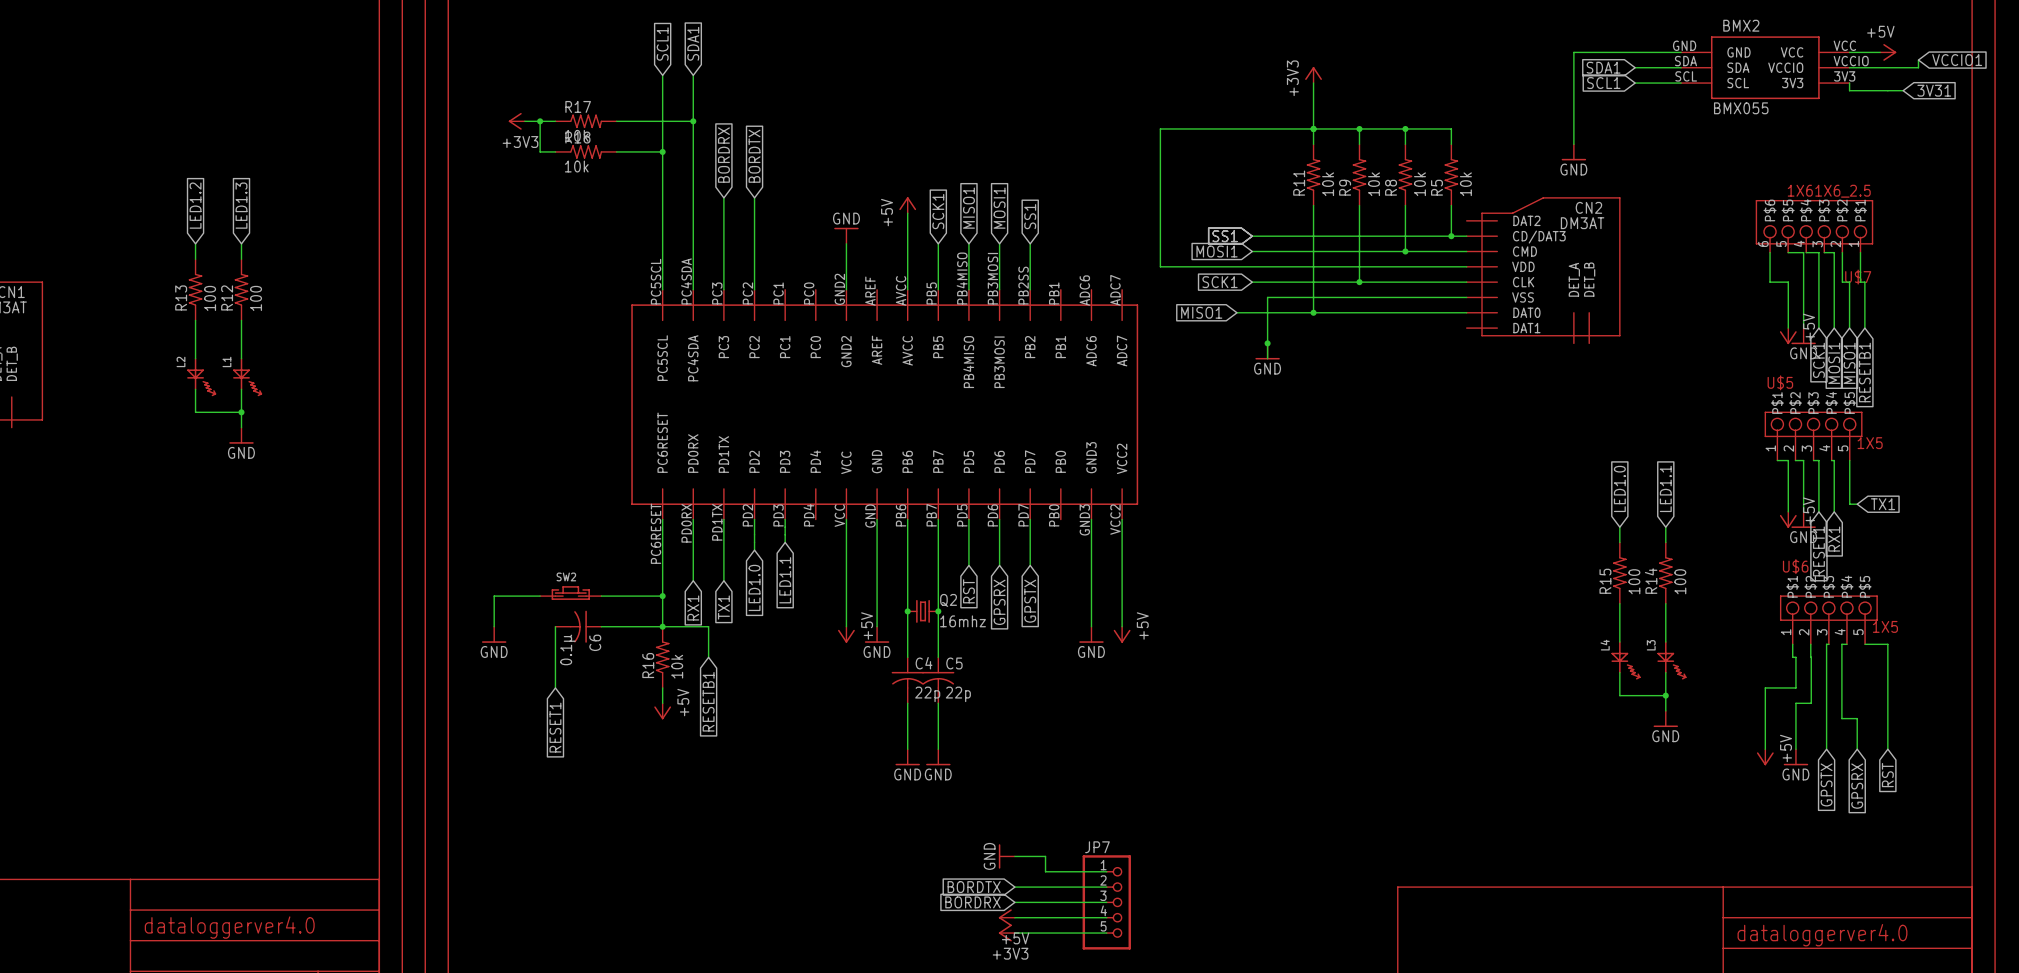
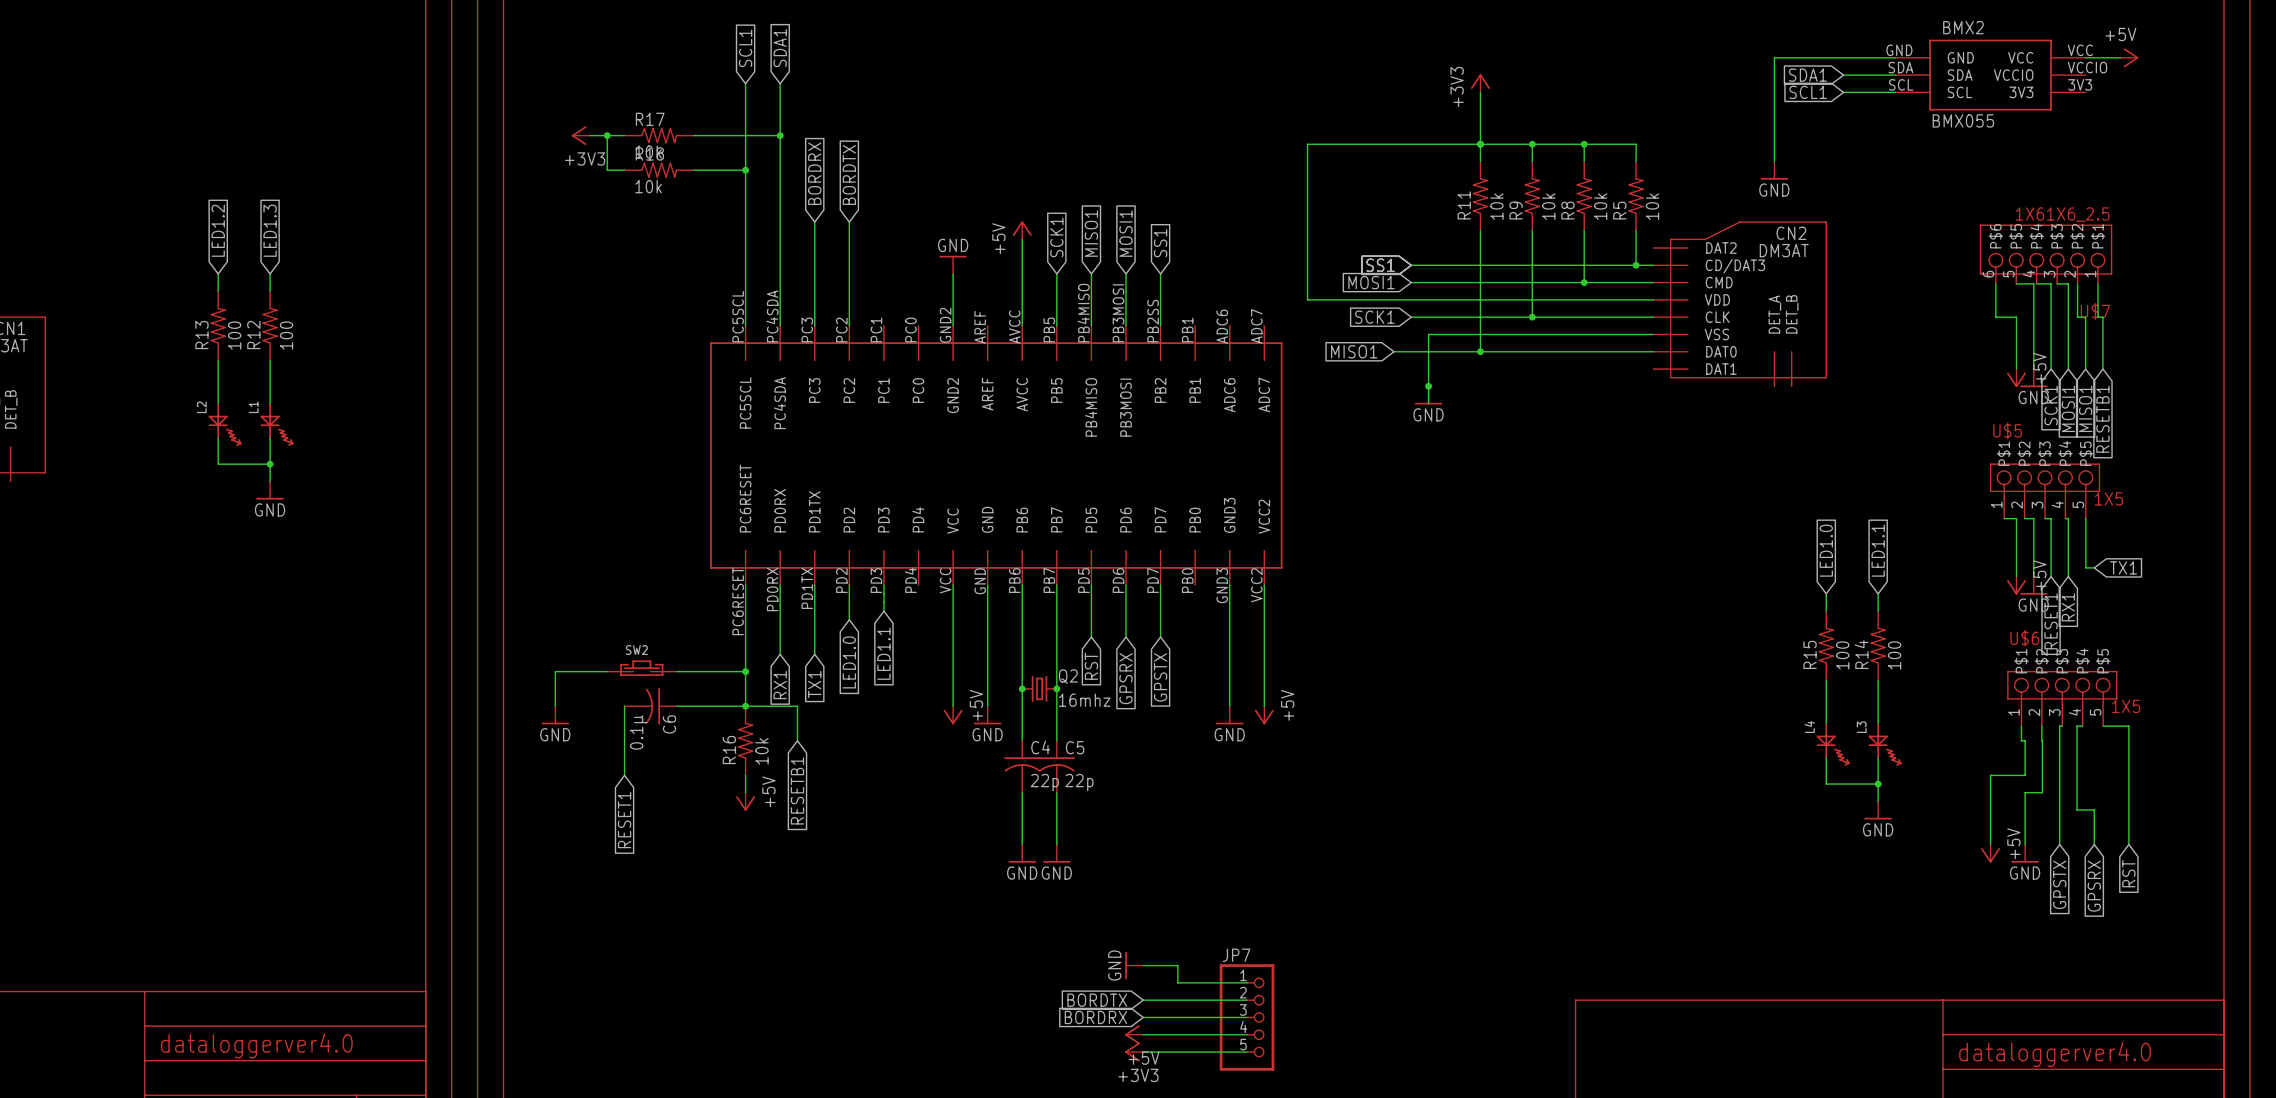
wire: (1918, 60) (1918, 67) (1849, 67) -> none
global label: VCCIO1 (1957, 60) -> none
wire: (1849, 83) (1849, 90) (1903, 90) -> none
global label: 3V31 (1934, 90) -> none

